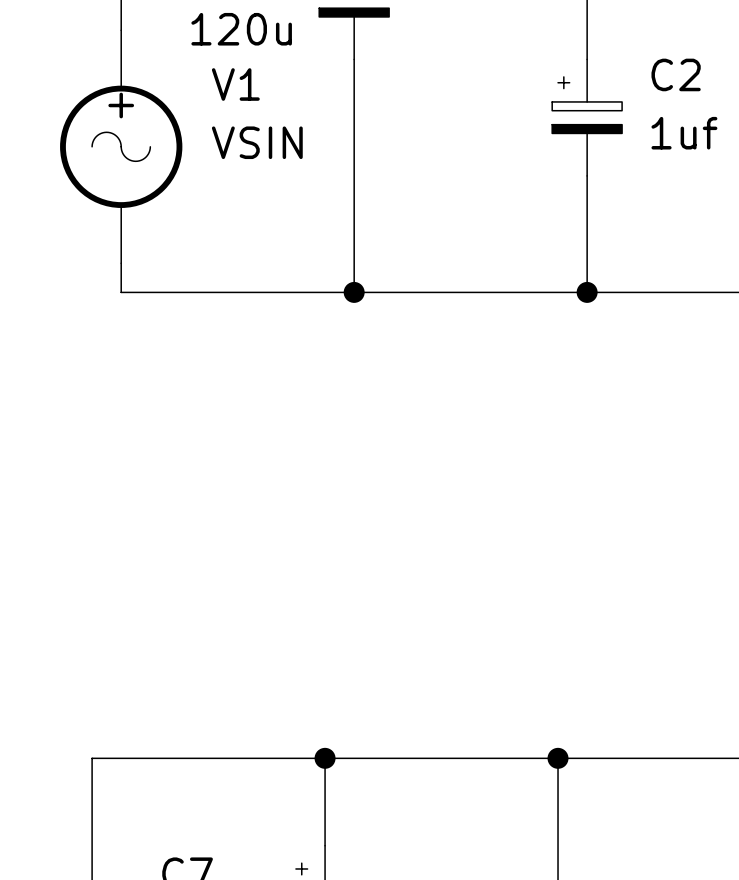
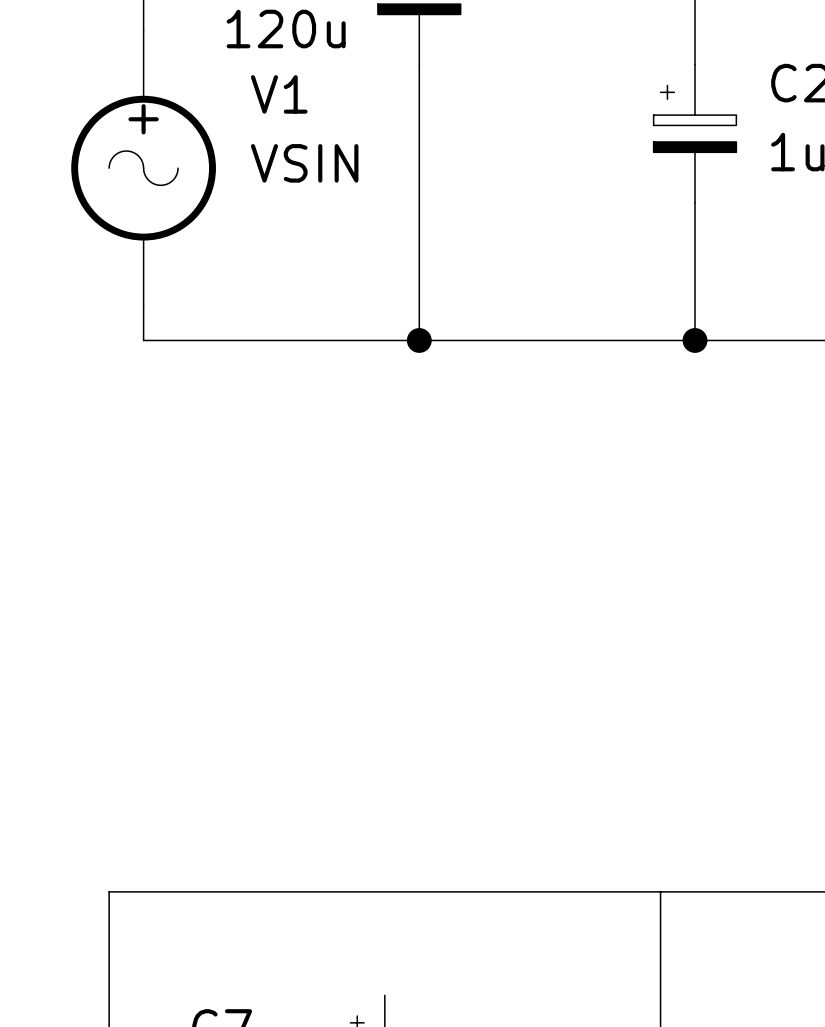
wire: (325, 758) (325, 845) -> none
junction: (325, 758) -> none
junction: (558, 758) -> none

